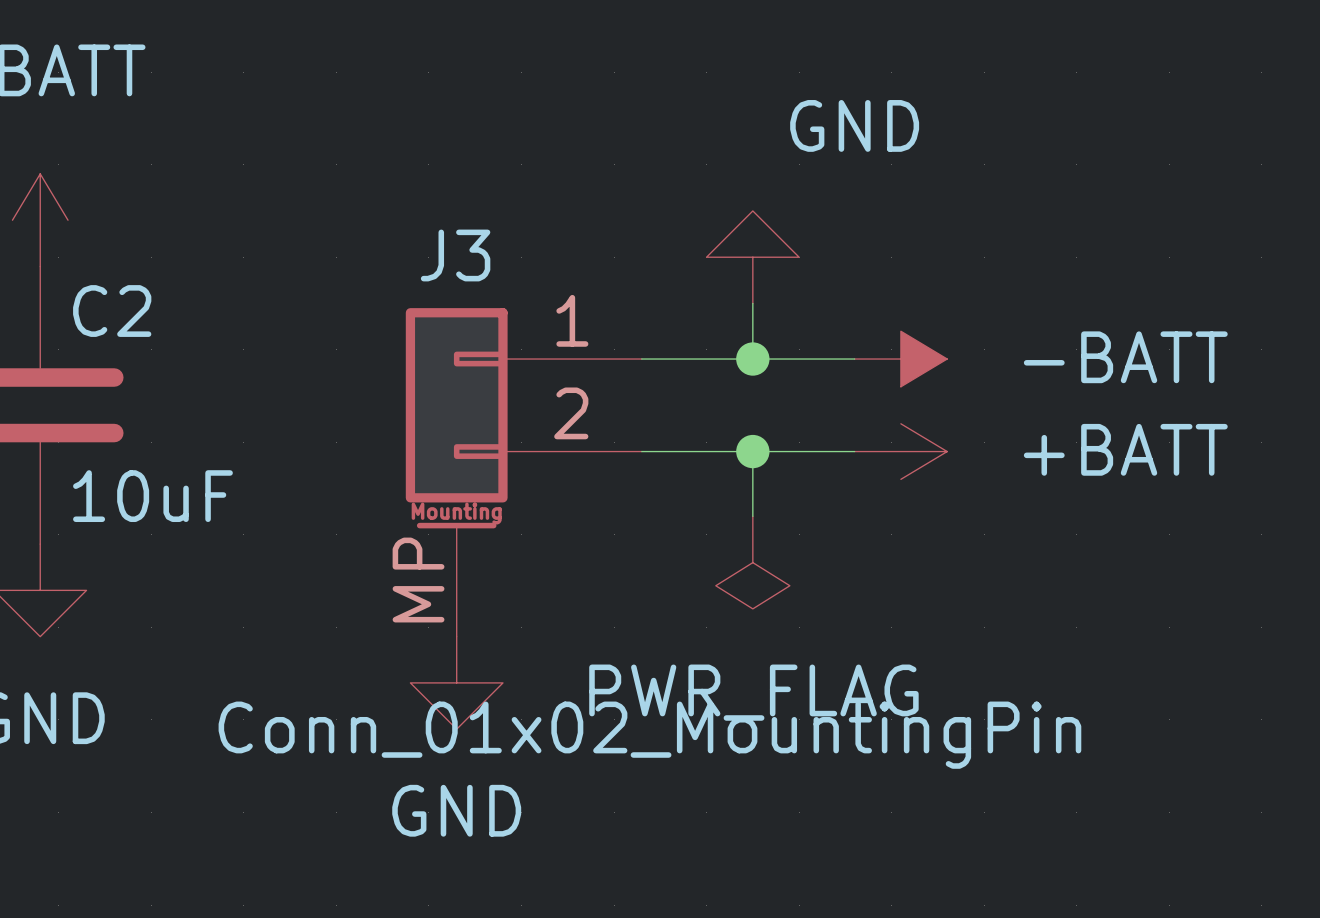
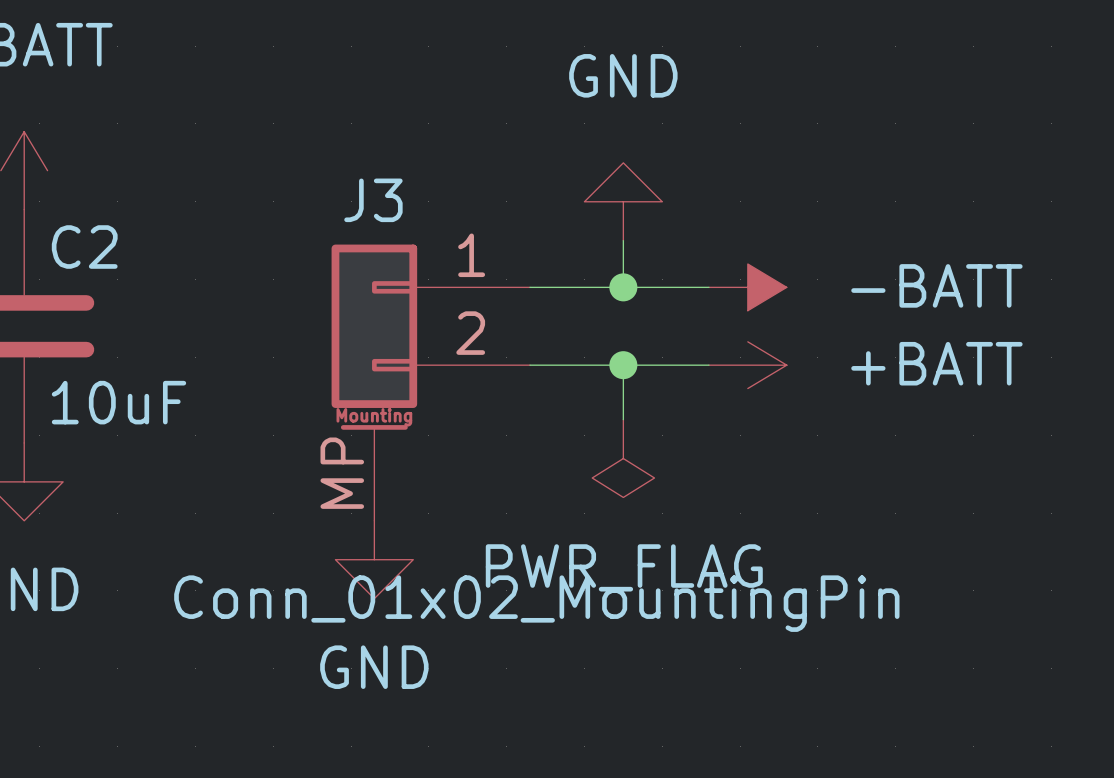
power symbol text position: GND (854, 125) -> GND (623, 75)

